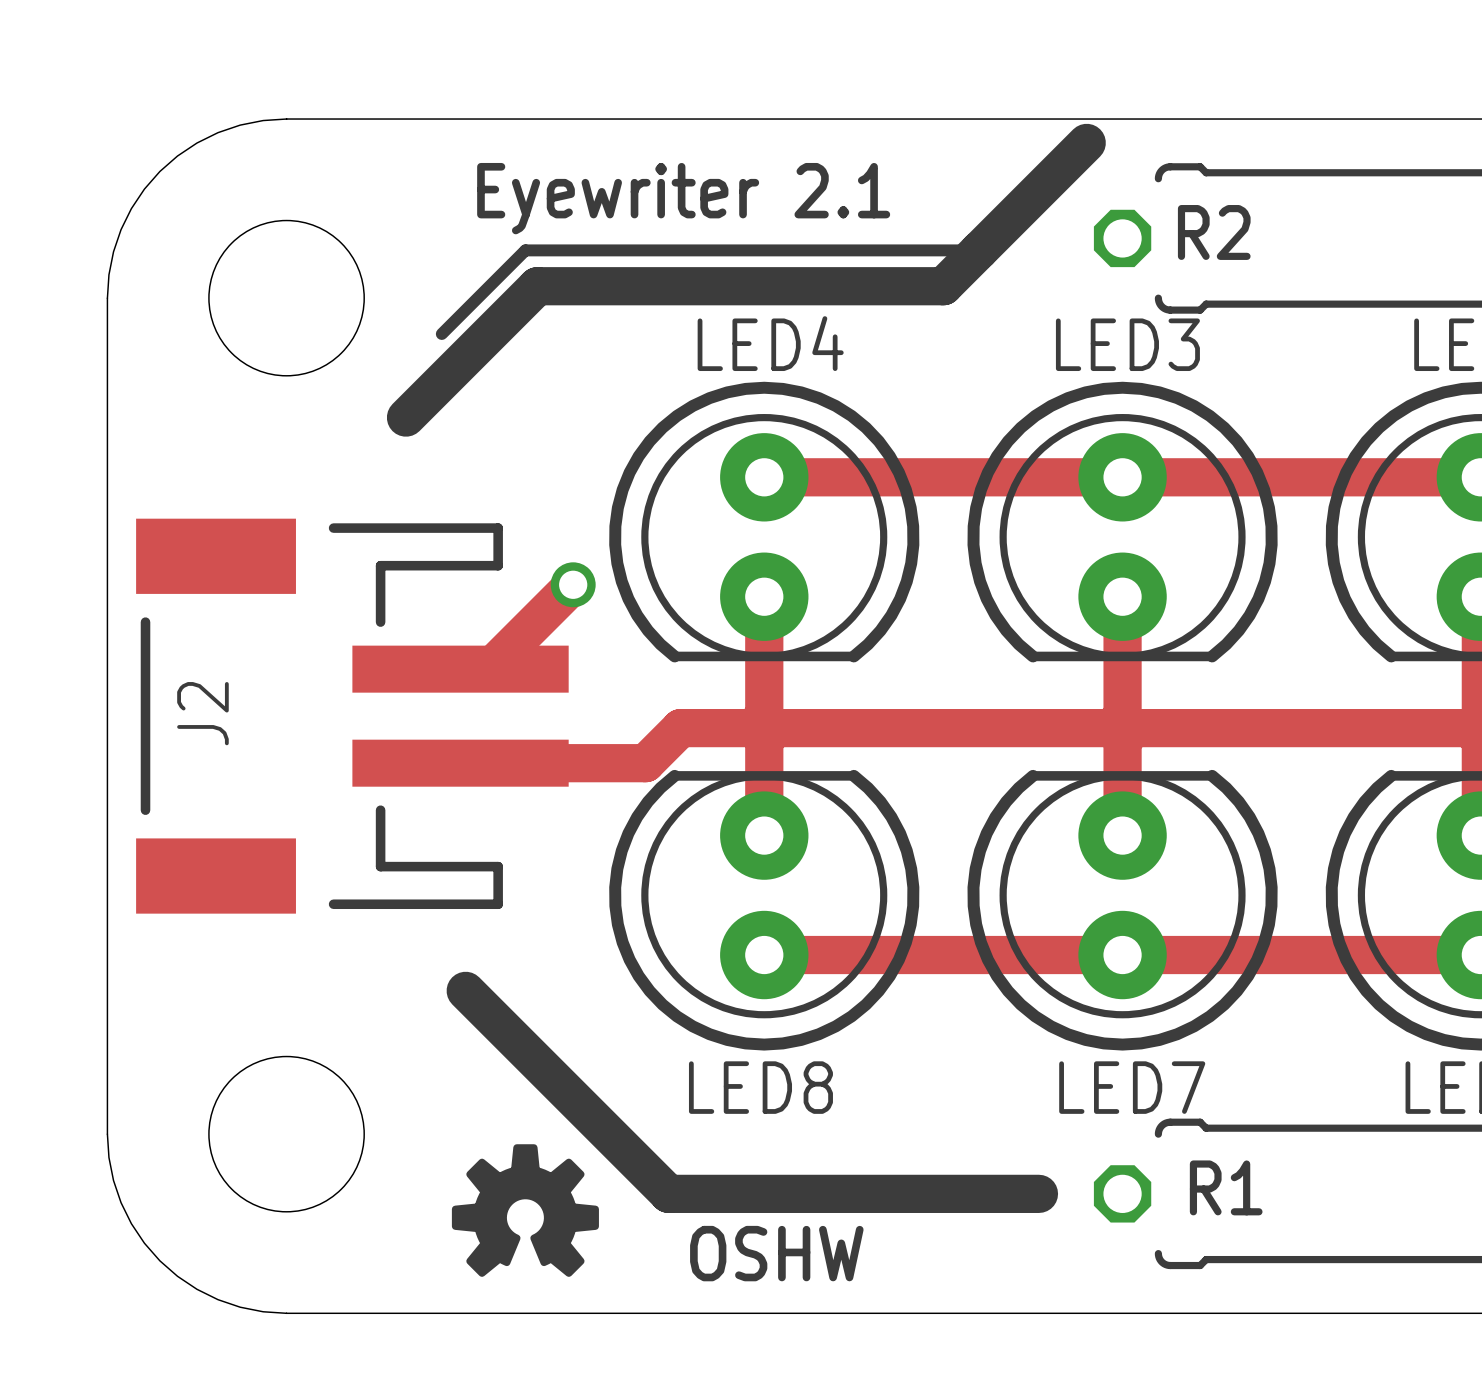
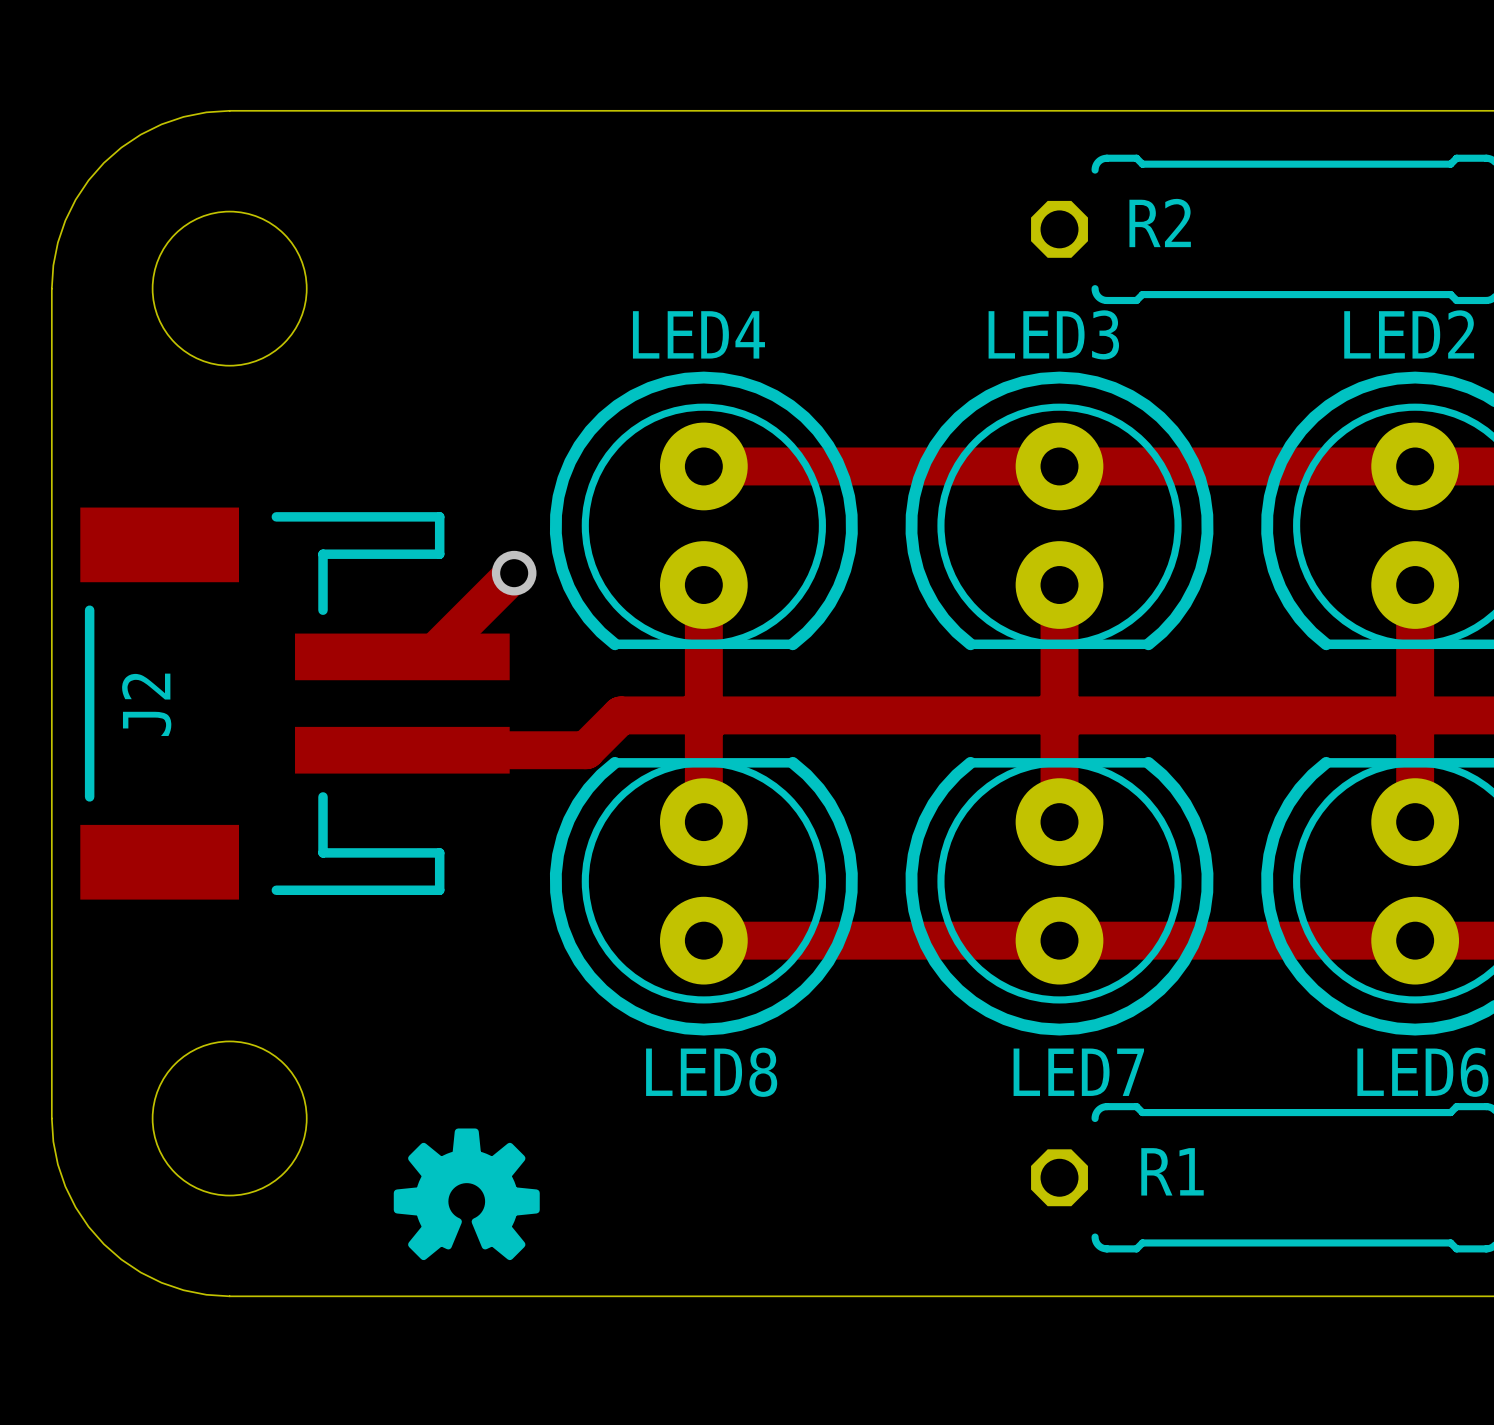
line: (1086, 142) (943, 286) (537, 286) (405, 417) -> none
text: Eyewriter 2.1 (683, 198) -> none
line: (979, 250) (525, 250) (441, 333) -> none
line: (465, 990) (668, 1193) (1038, 1193) -> none
text: OSHW (776, 1253) -> none

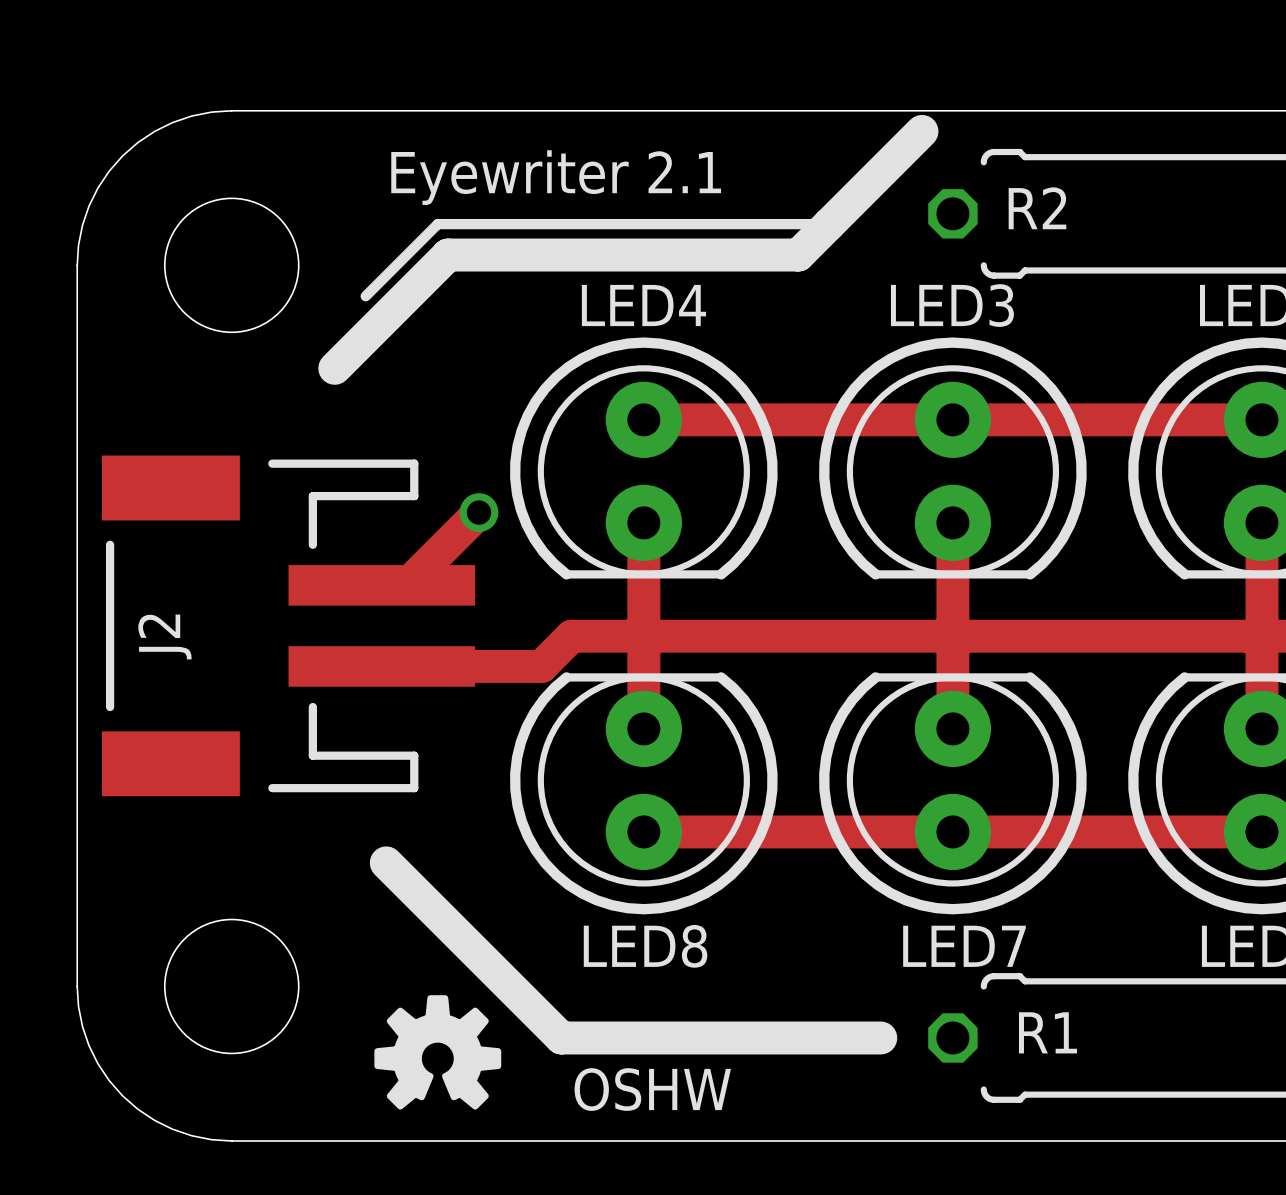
line: none -> (922, 131) (798, 255) (448, 255) (334, 368)
text: none -> Eyewriter 2.1 (556, 177)
line: none -> (829, 224) (437, 224) (365, 296)
line: none -> (386, 862) (561, 1037) (880, 1037)
text: none -> OSHW (652, 1089)

